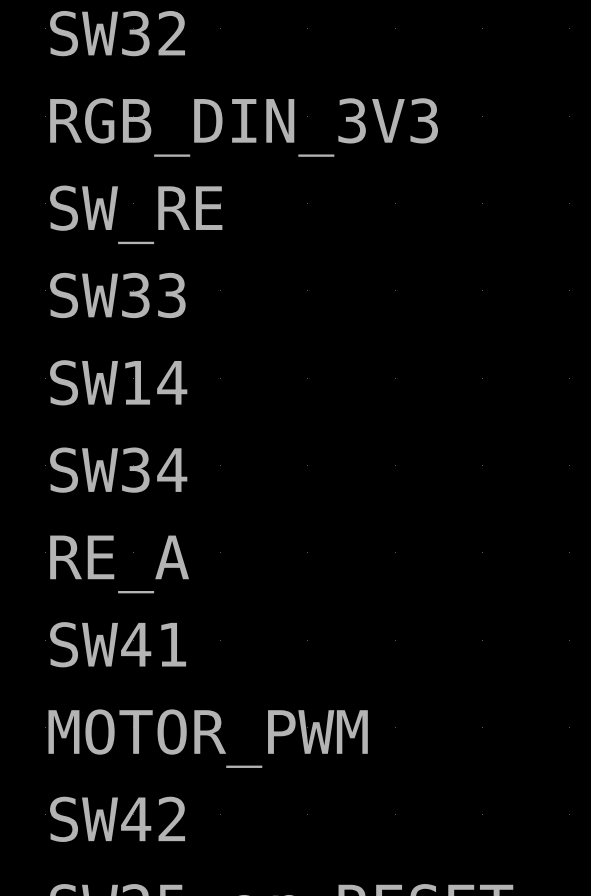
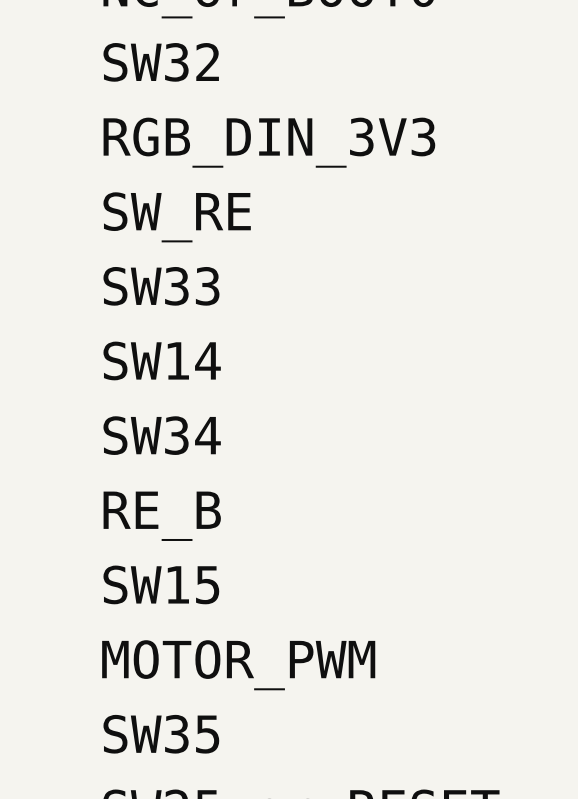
label: RE_A (119, 564) -> RE_B (162, 516)
label: SW41 (118, 644) -> SW15 (161, 584)
label: SW42 (117, 819) -> SW35 (161, 734)

